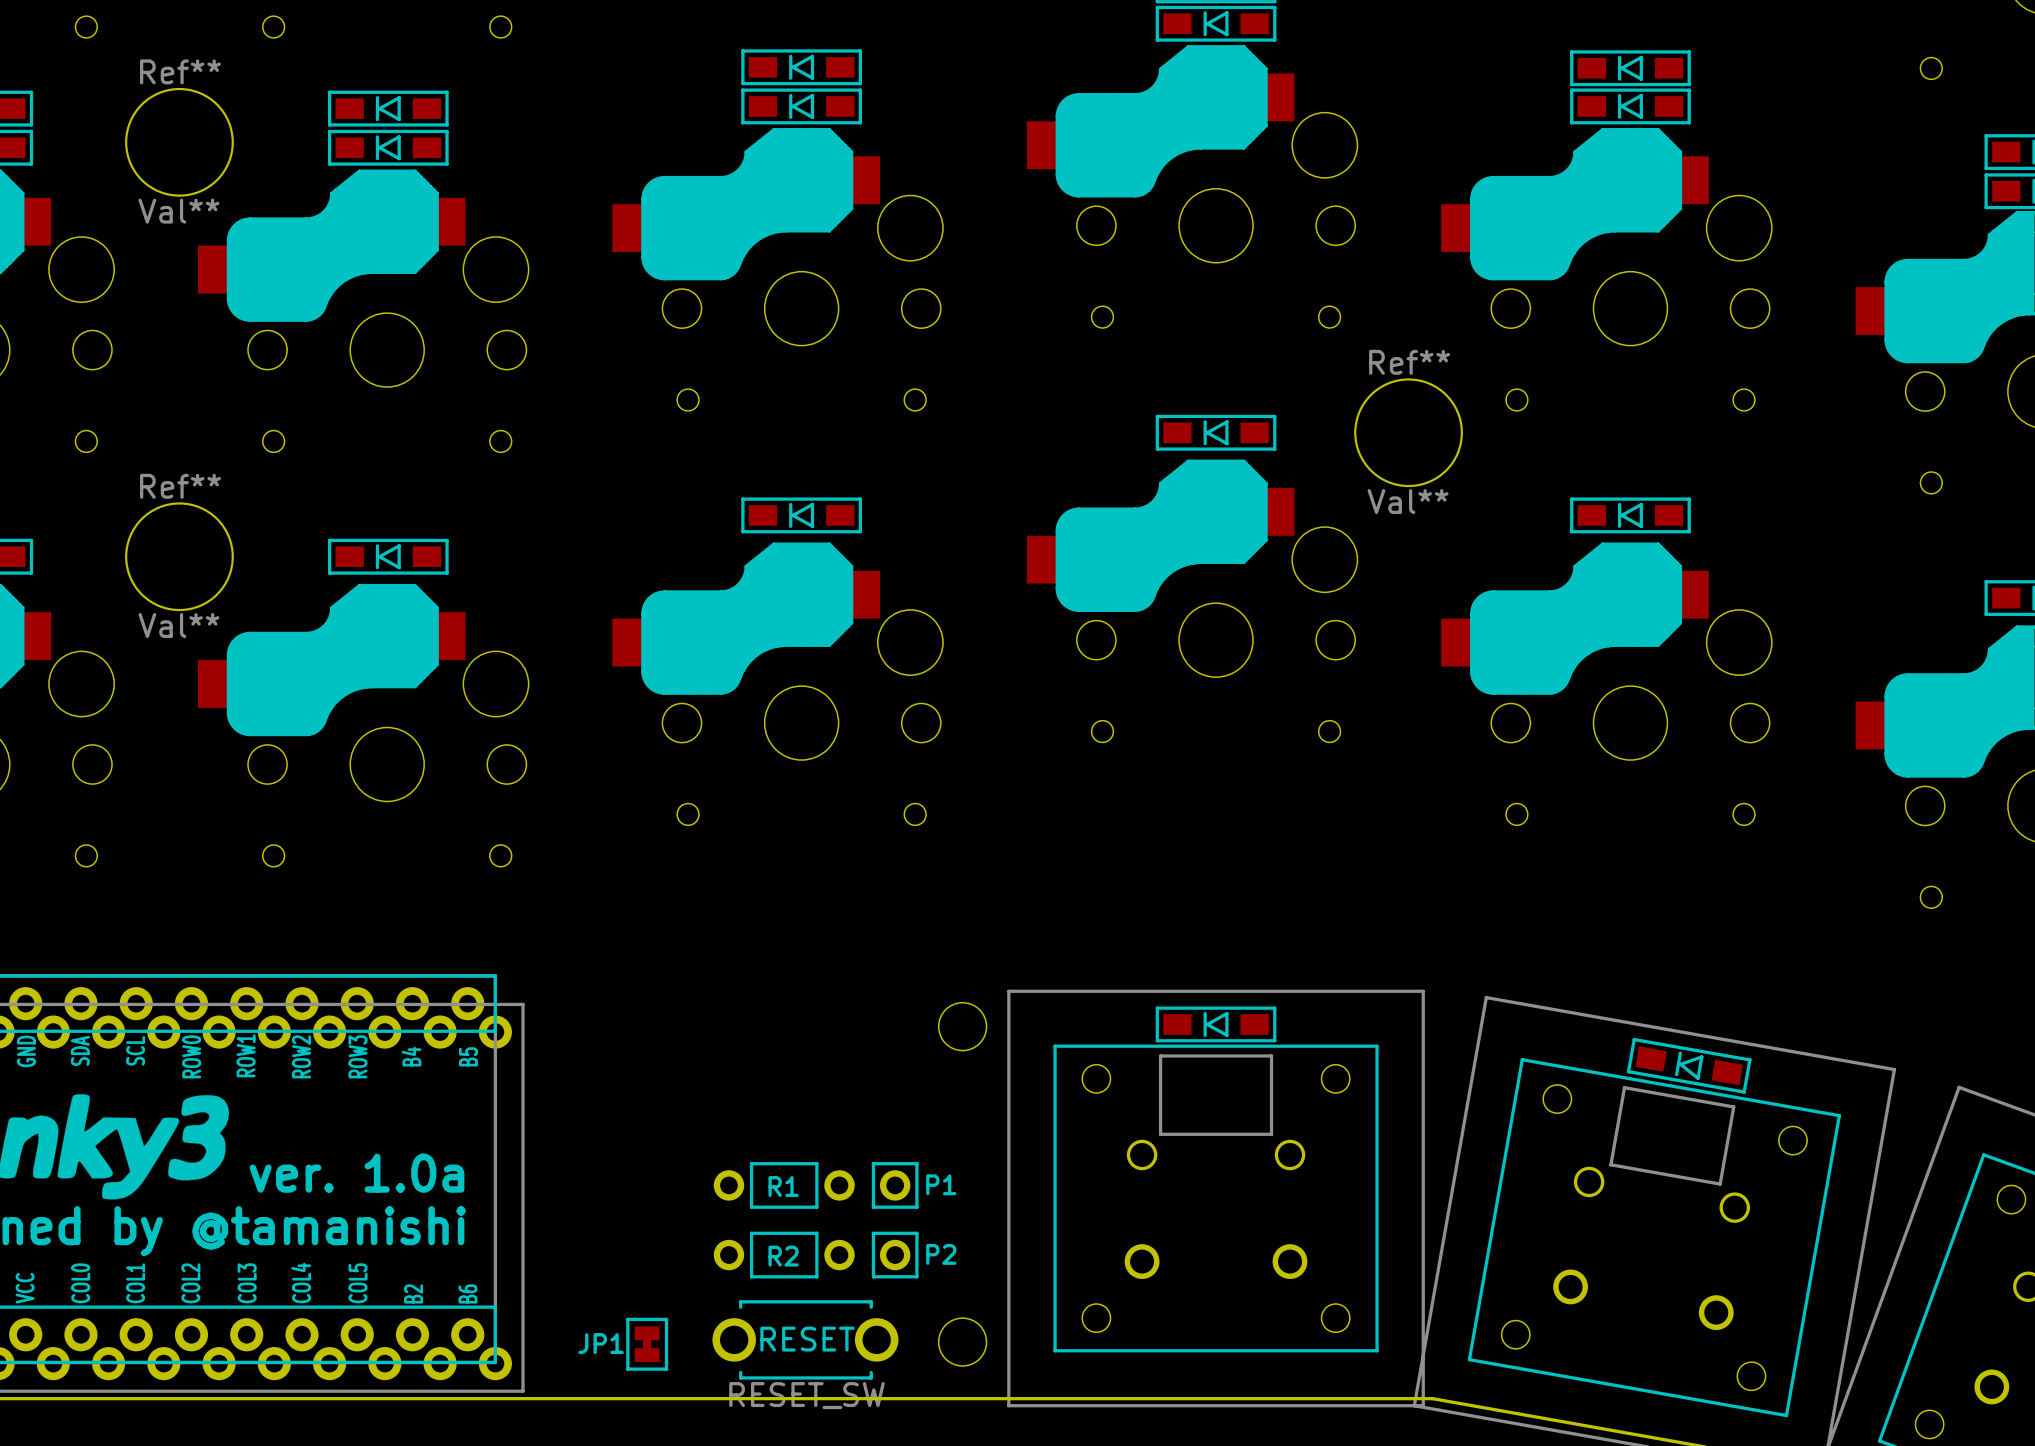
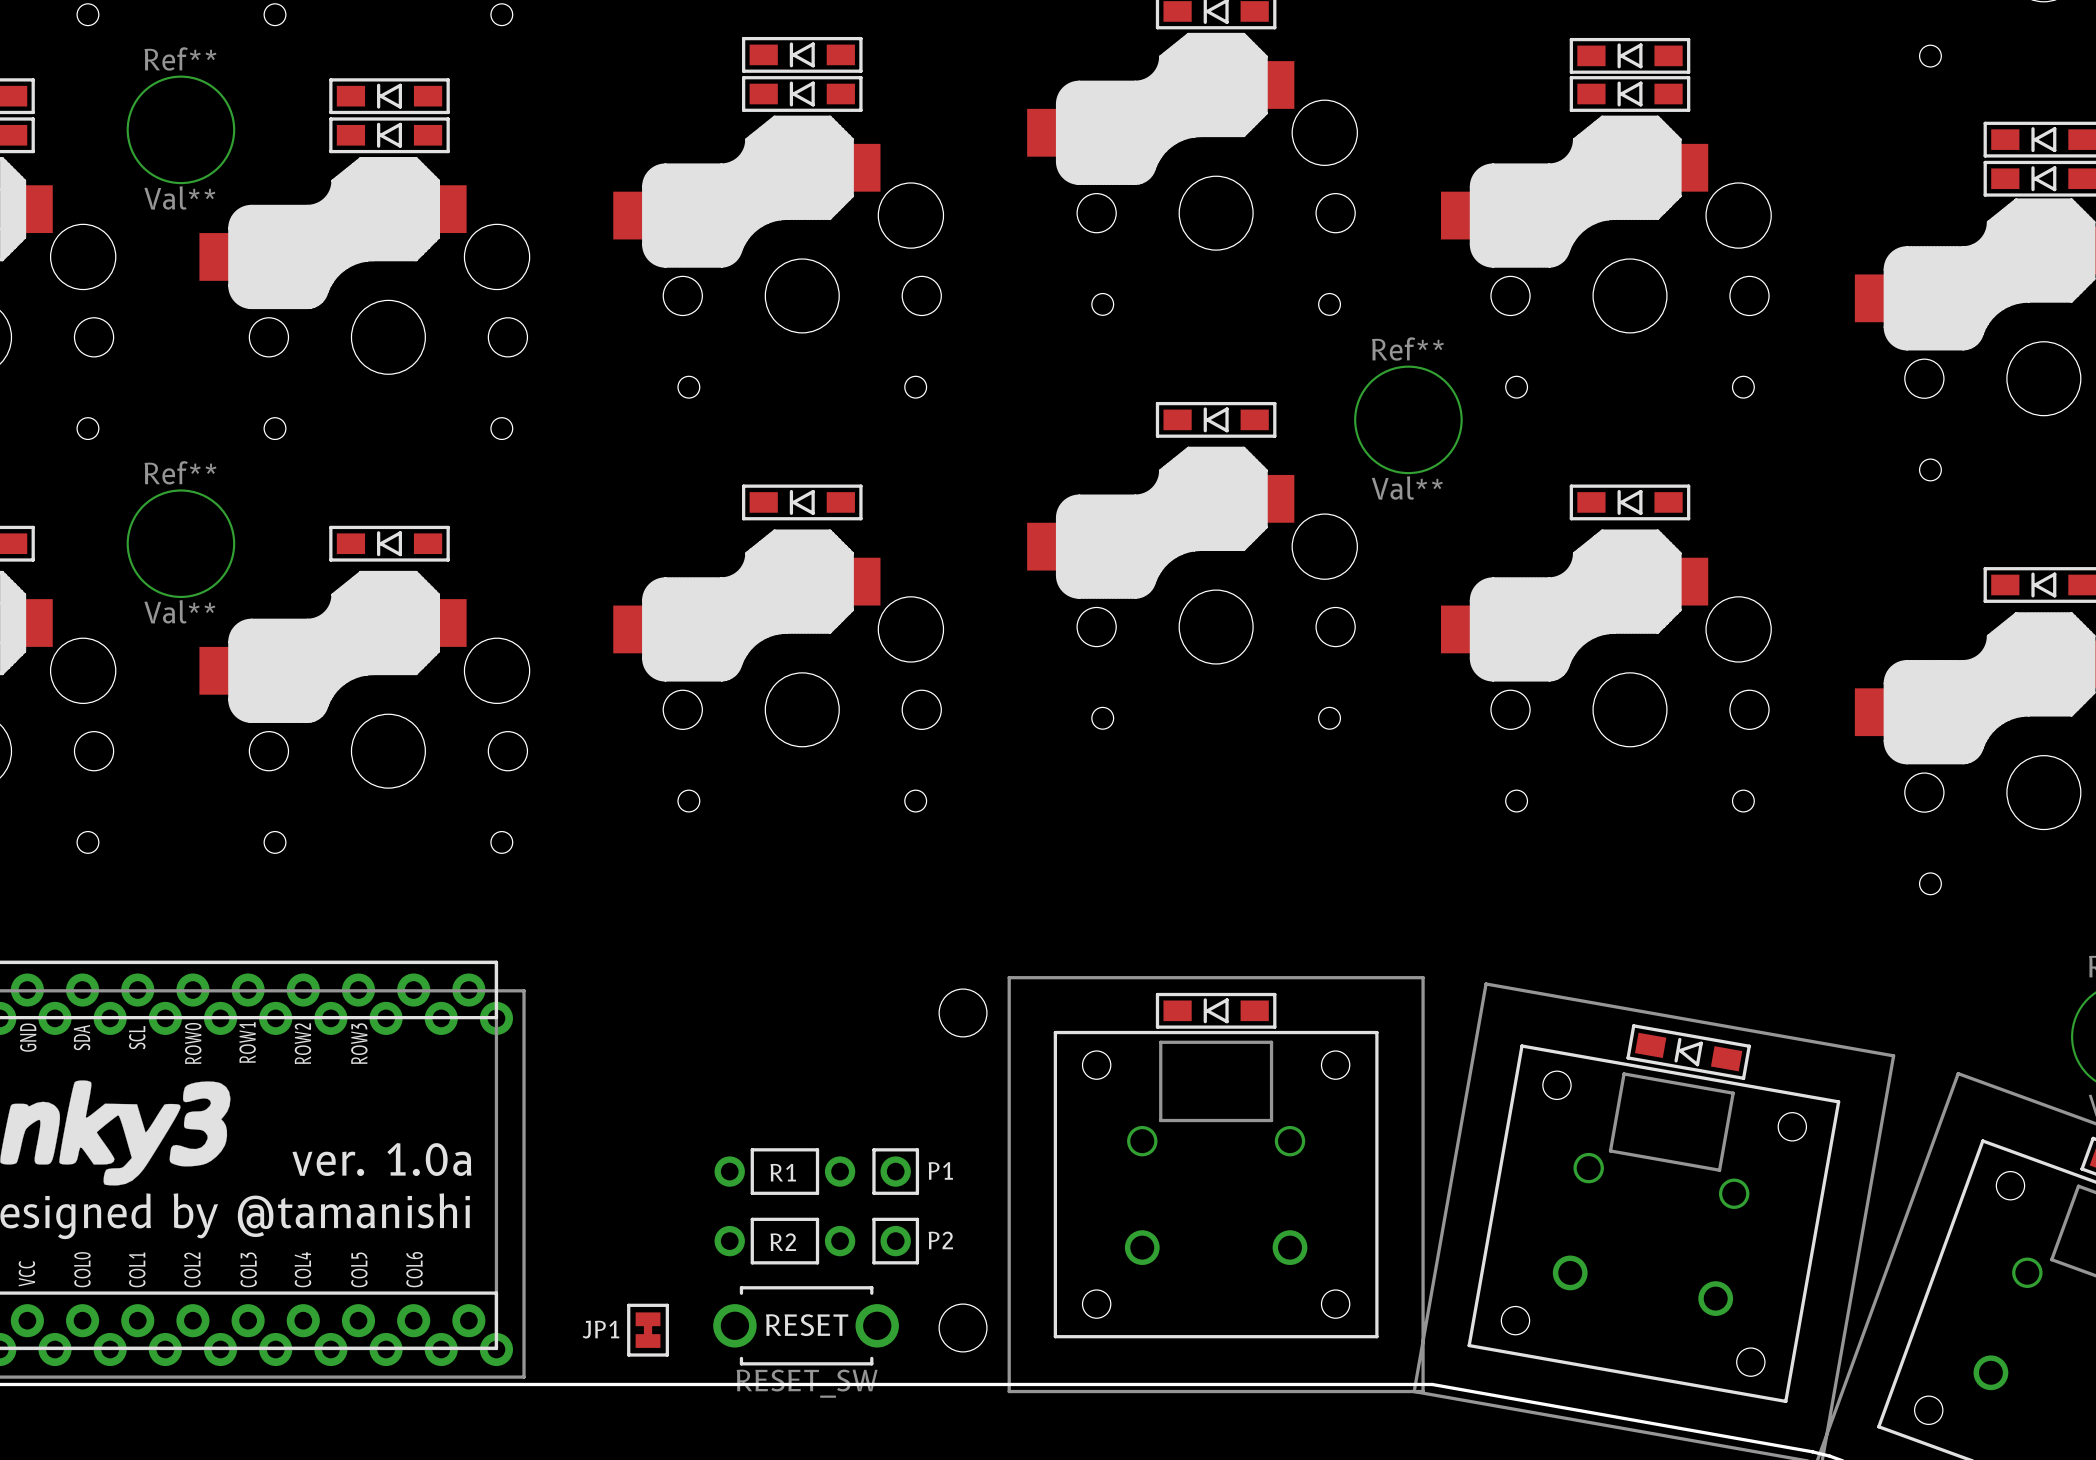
part text: B4 (411, 1056) -> none
part text: B5 (468, 1056) -> none
part text: none -> COL6 (414, 1269)
part text: B2 (413, 1293) -> none
part text: B6 (467, 1293) -> none

